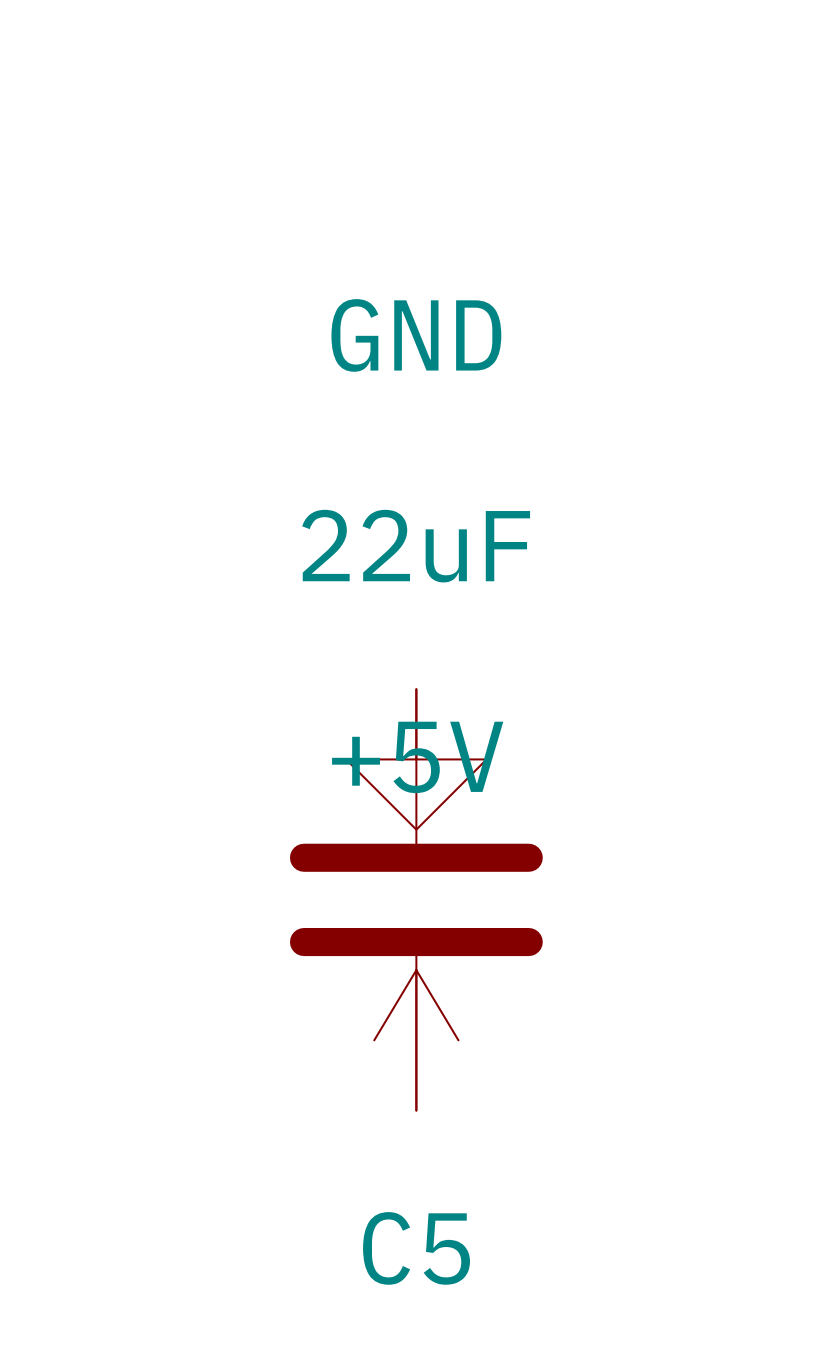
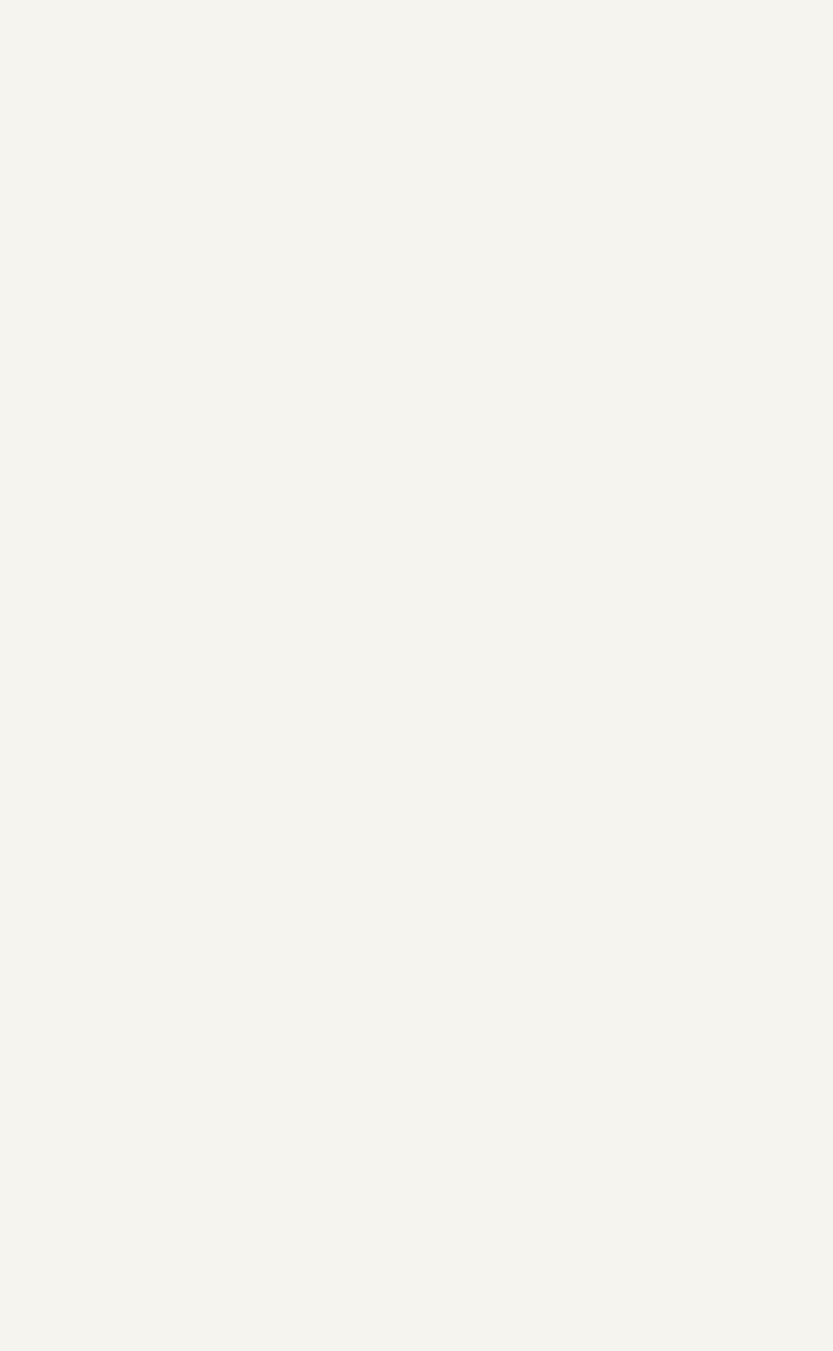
power symbol: GND (416, 759) -> none
C5: 22uF (416, 899) -> none
power symbol: +5V (416, 1040) -> none

